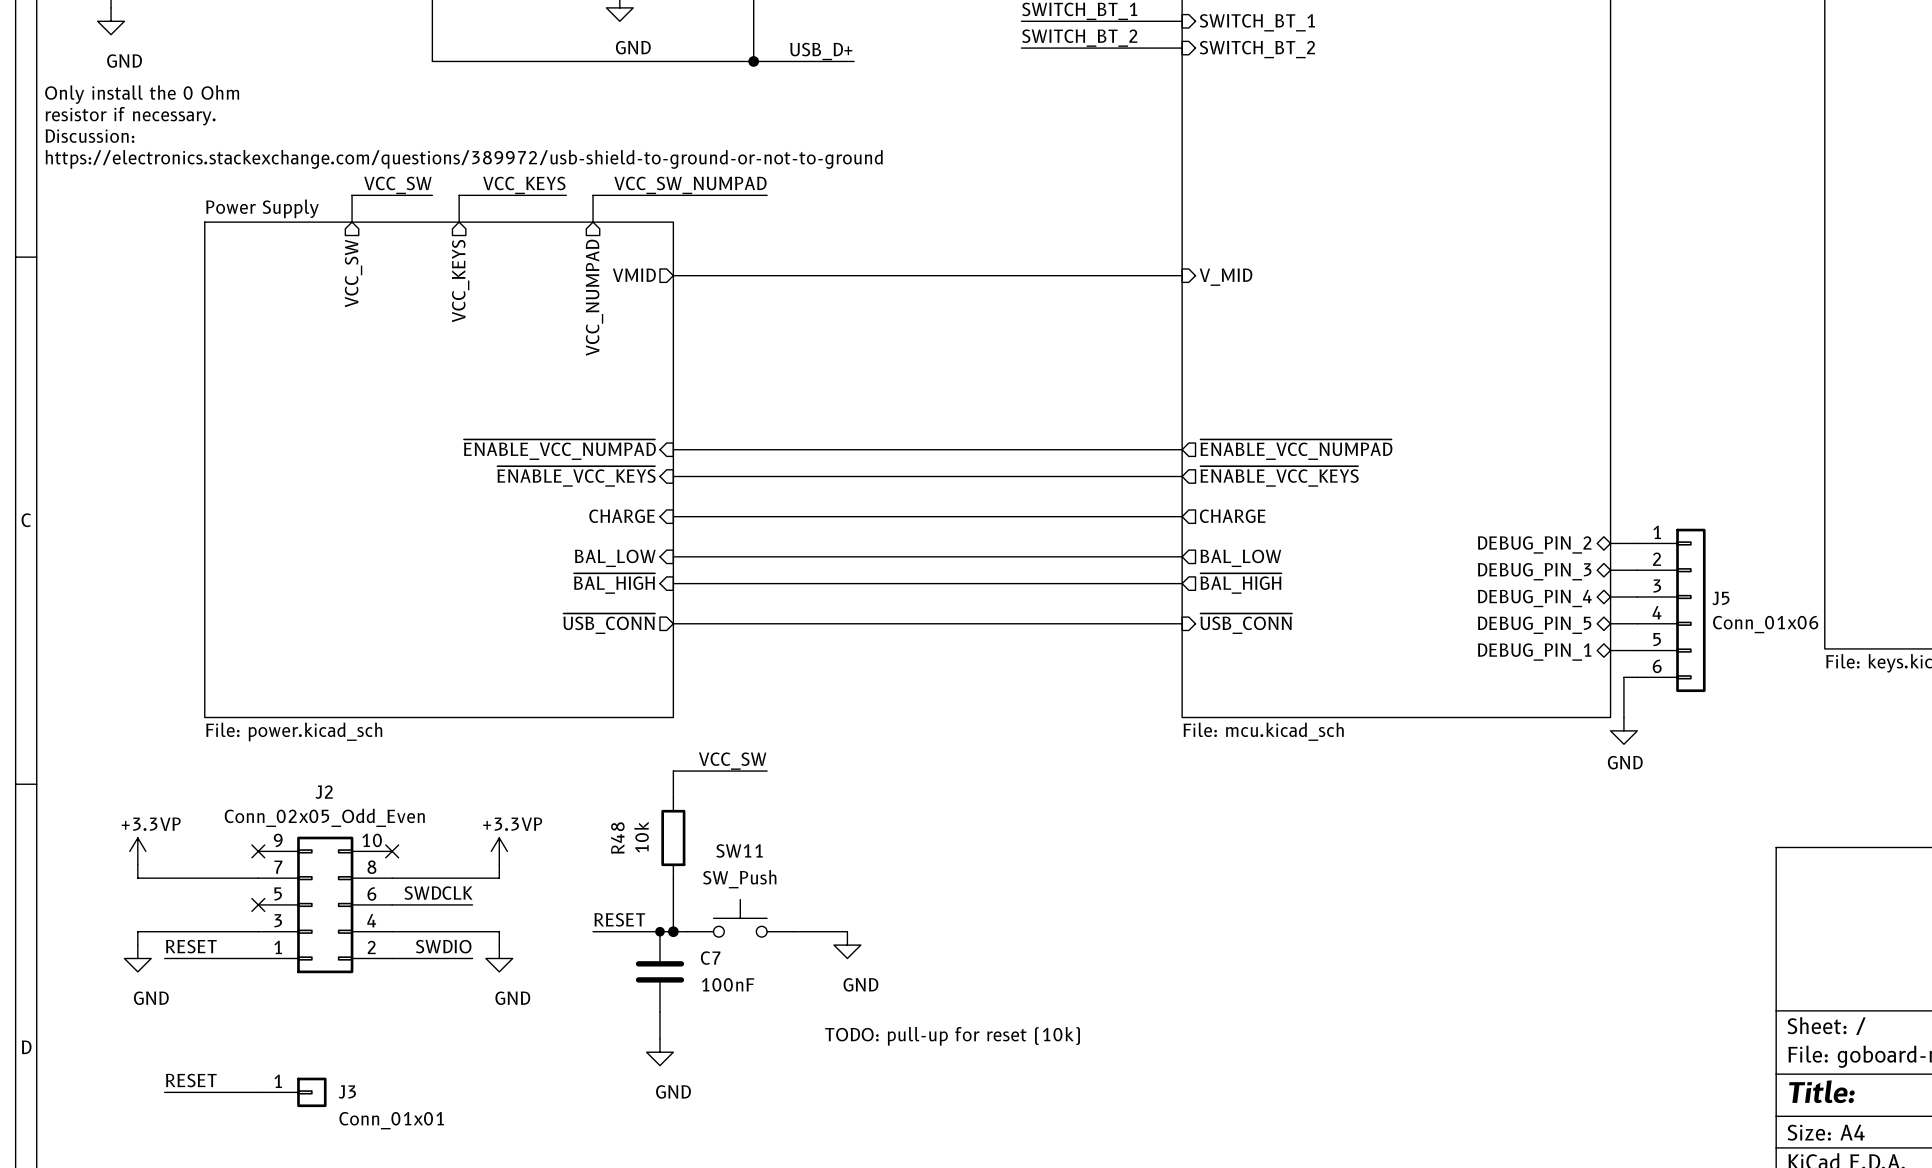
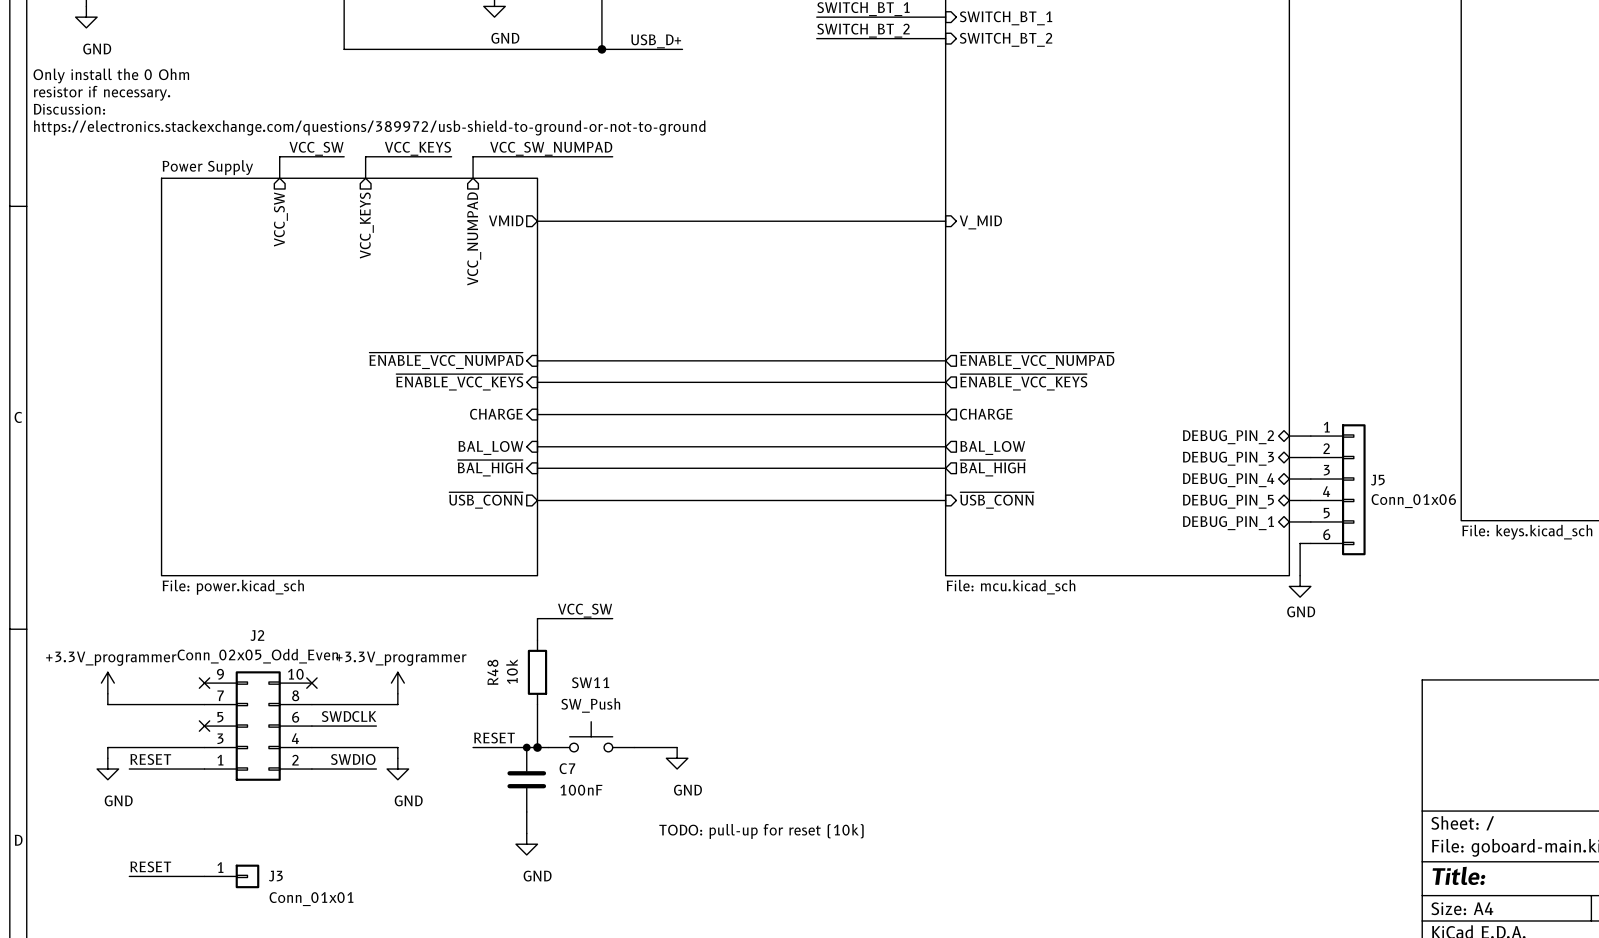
power symbol: +3.3VP (137, 851) -> +3.3V_programmer (107, 683)
power symbol: +3.3VP (499, 851) -> +3.3V_programmer (397, 683)

